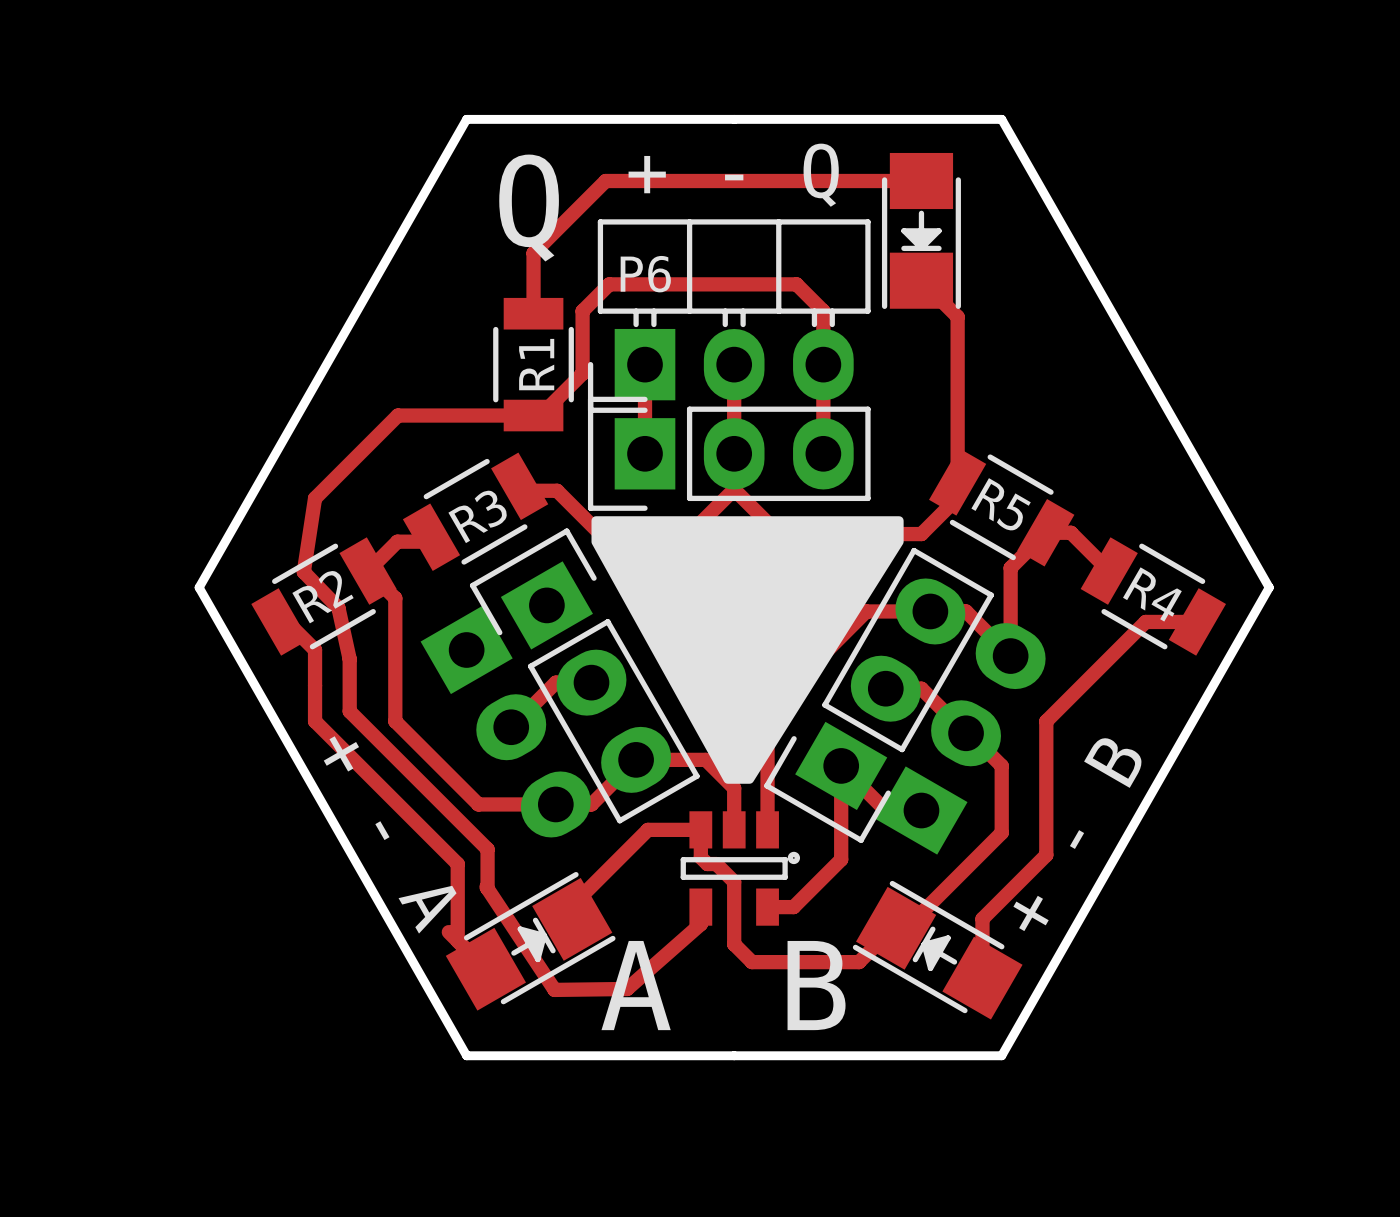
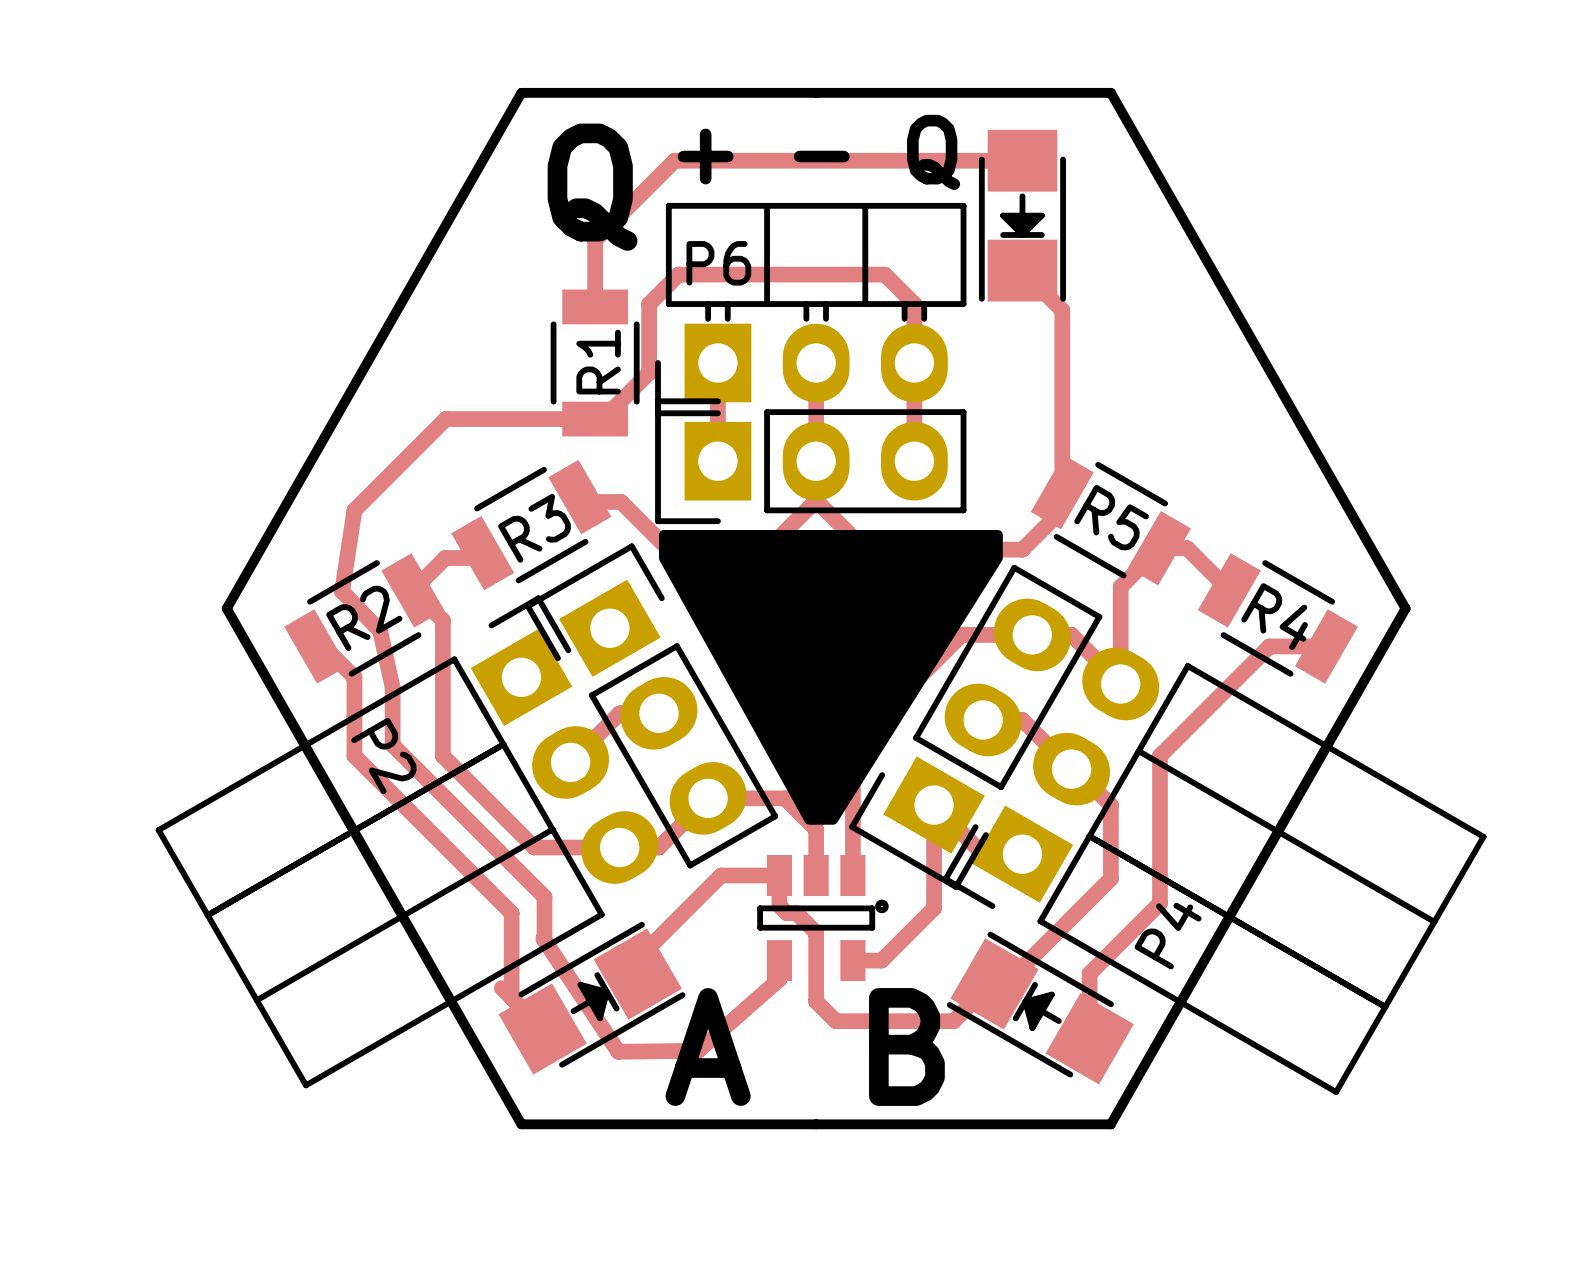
P2: none -> (406, 841)
P4: none -> (1214, 871)
text: + - A (390, 834) -> none
text: + - B (1077, 834) -> none

